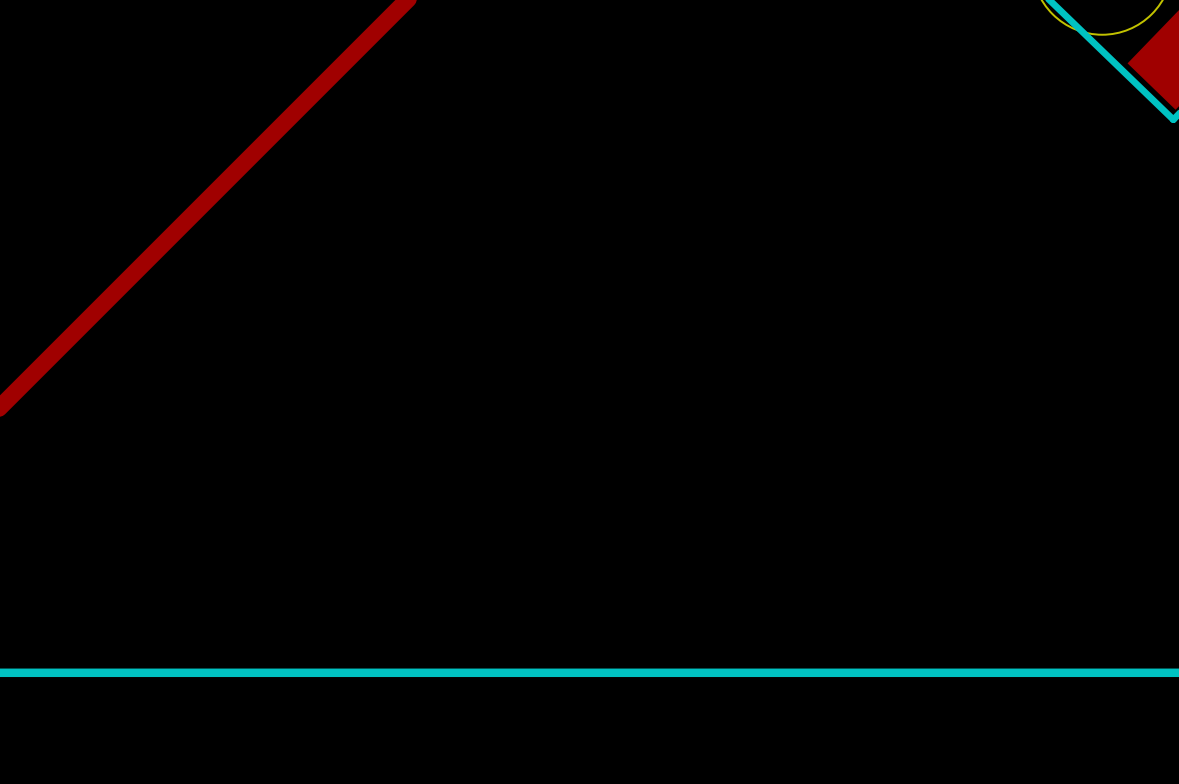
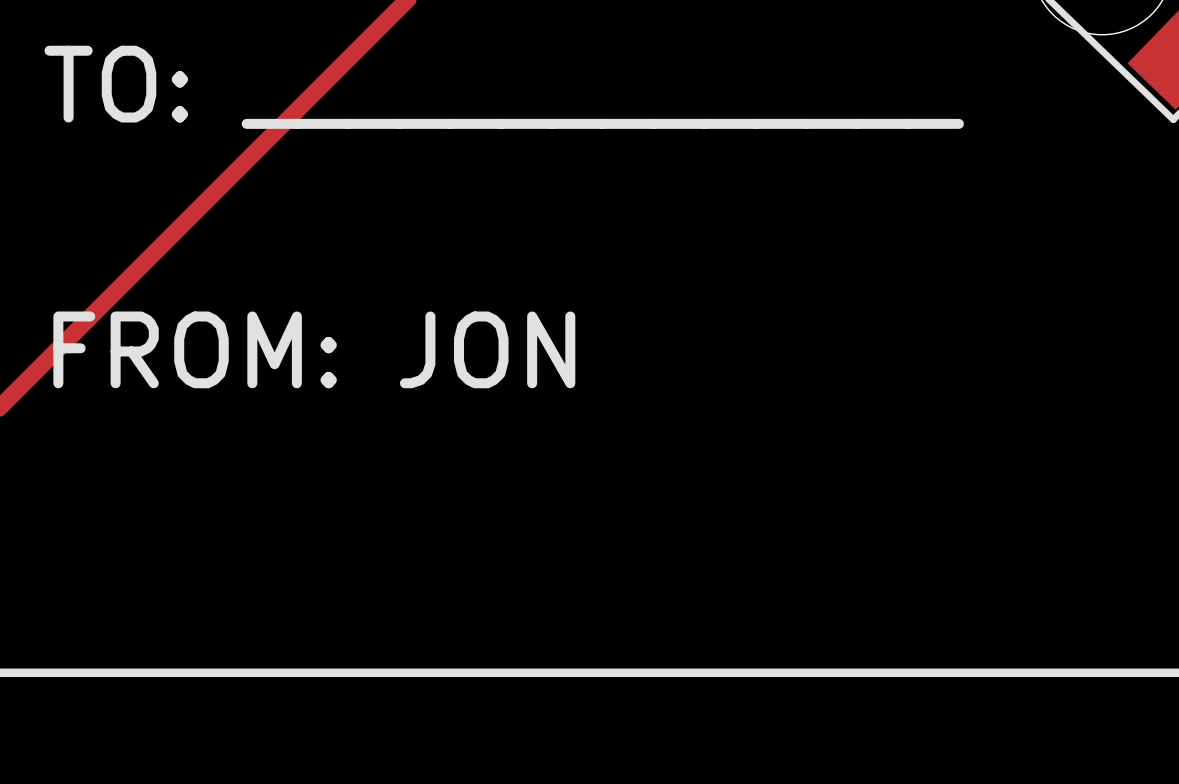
text: none -> TO: ______________ (504, 87)
text: none -> FROM: JON (314, 349)

